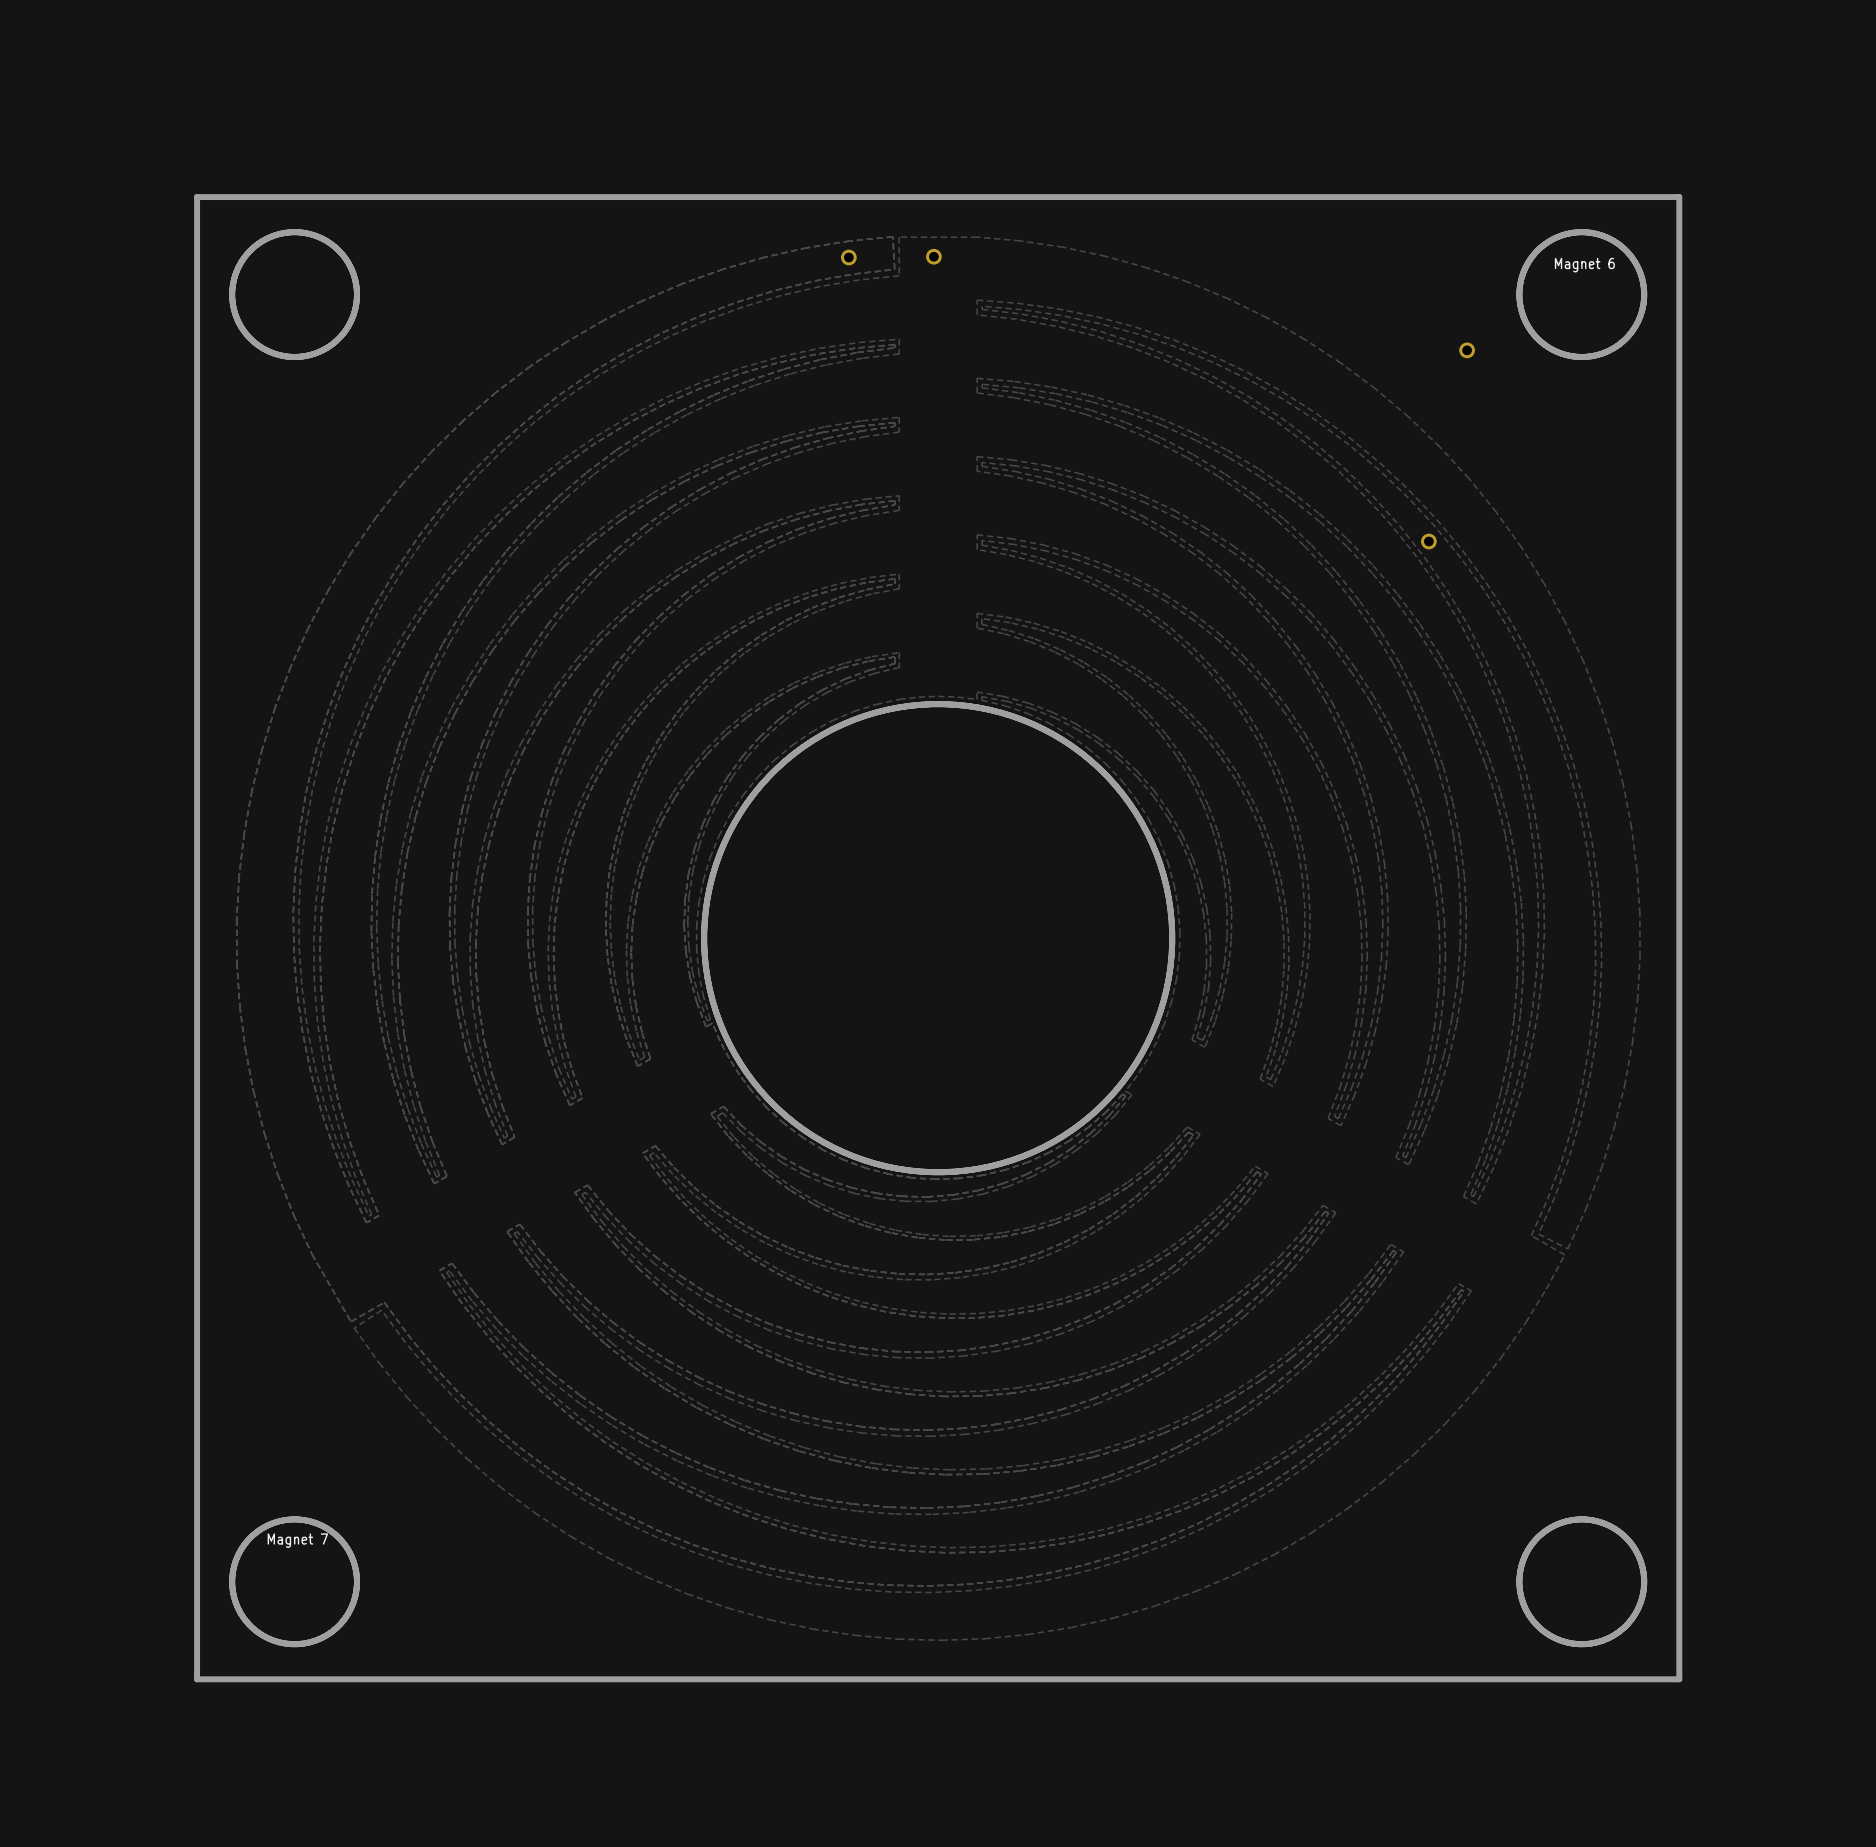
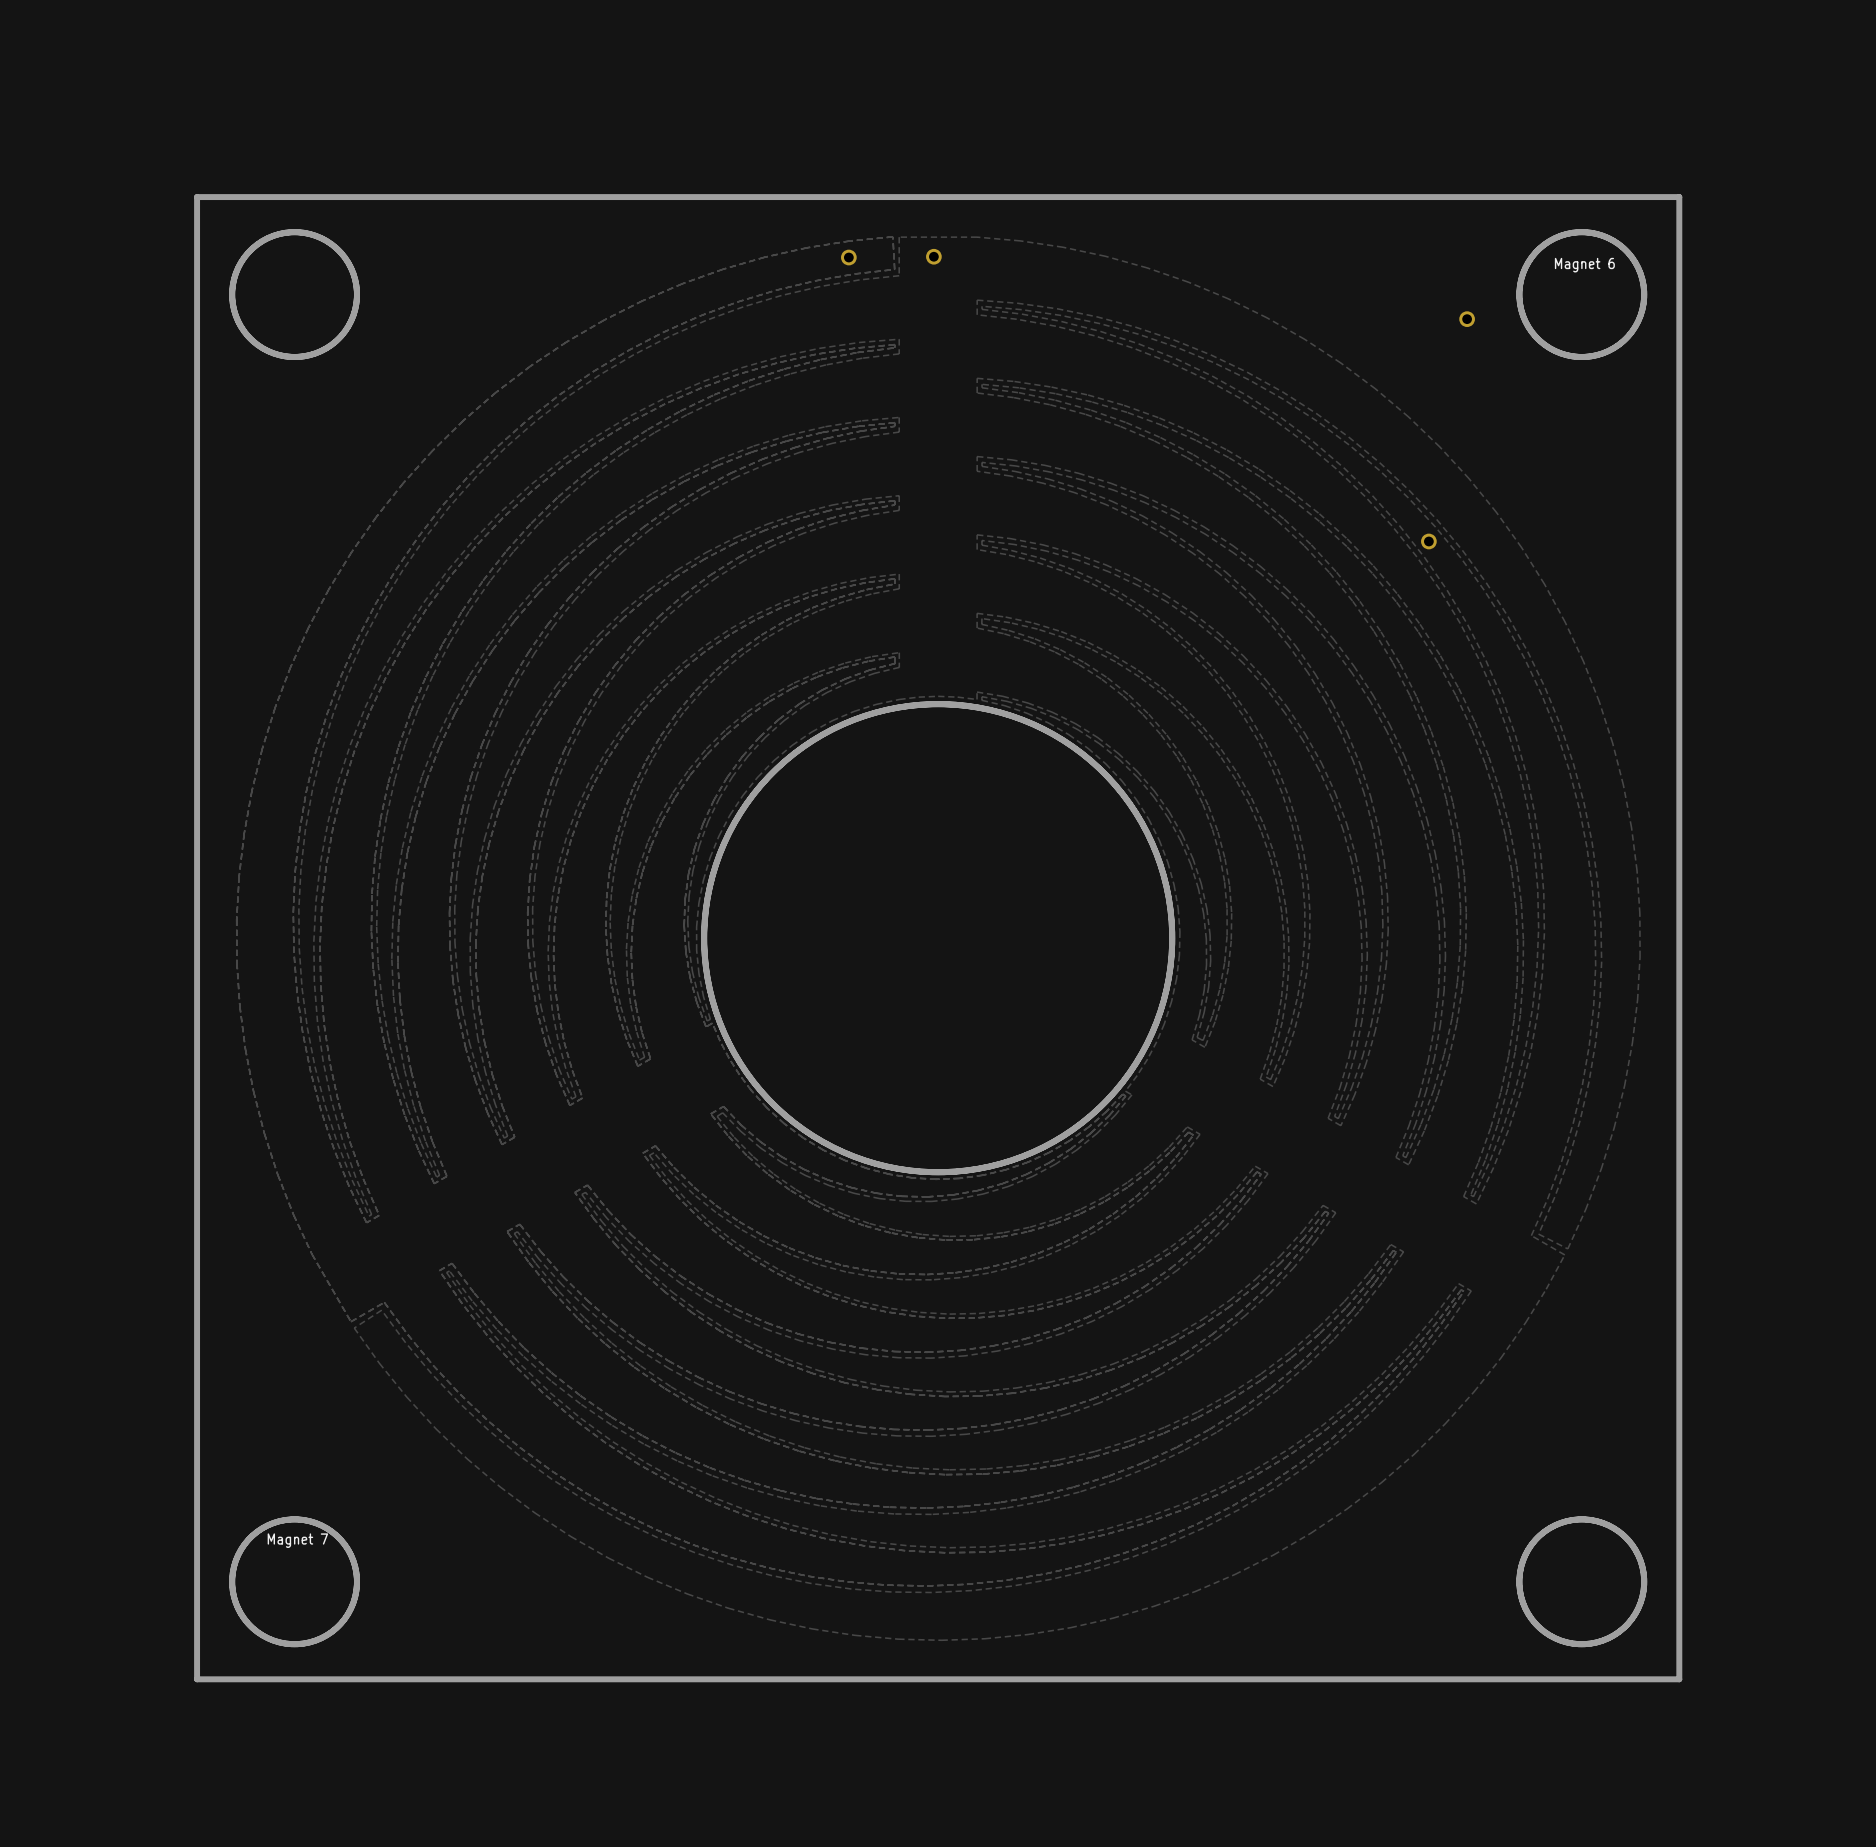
via position: (1467, 350) -> (1467, 319)

